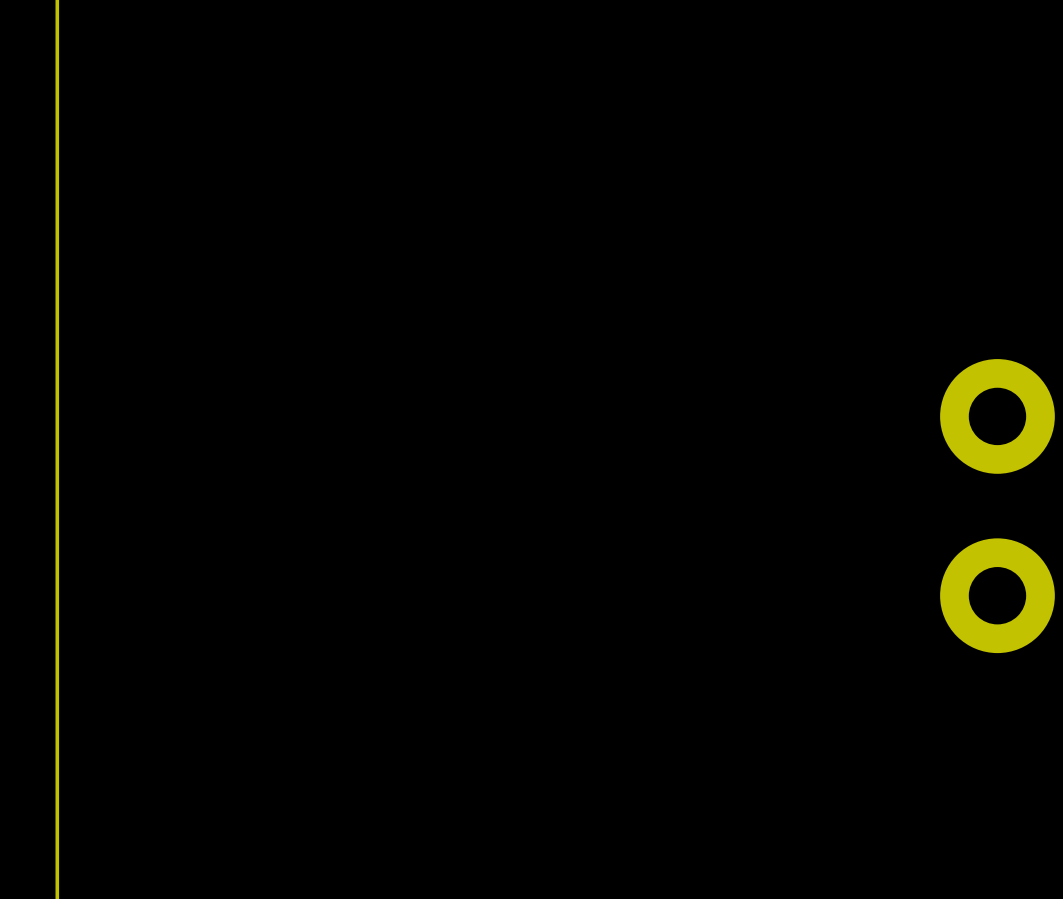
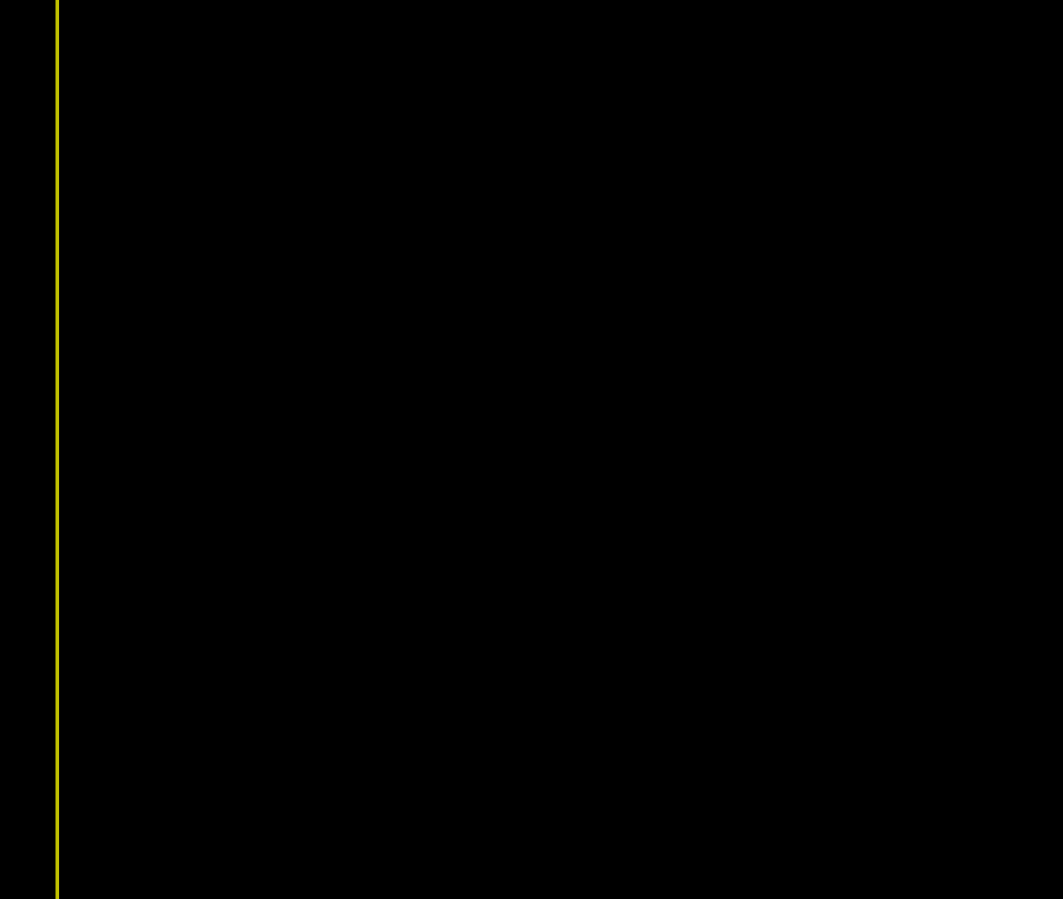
part: (997, 506) -> none

